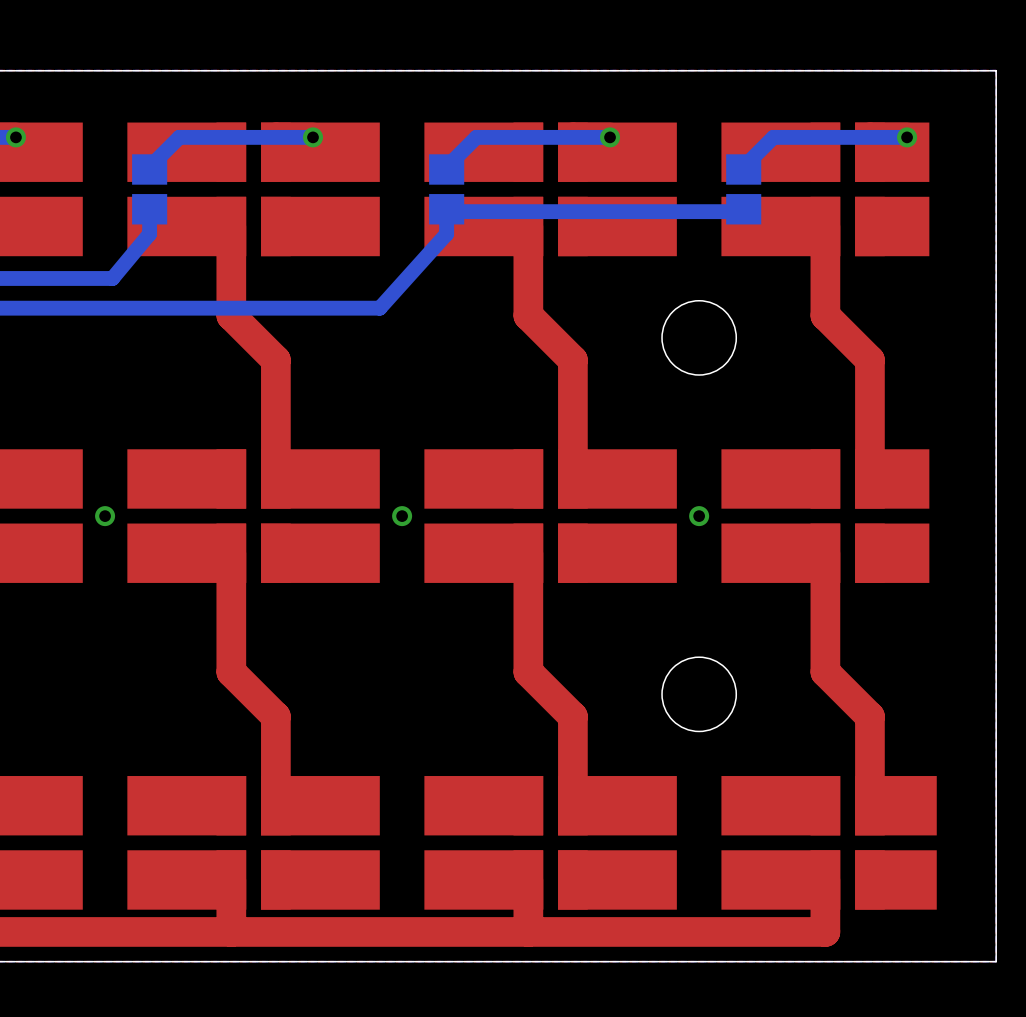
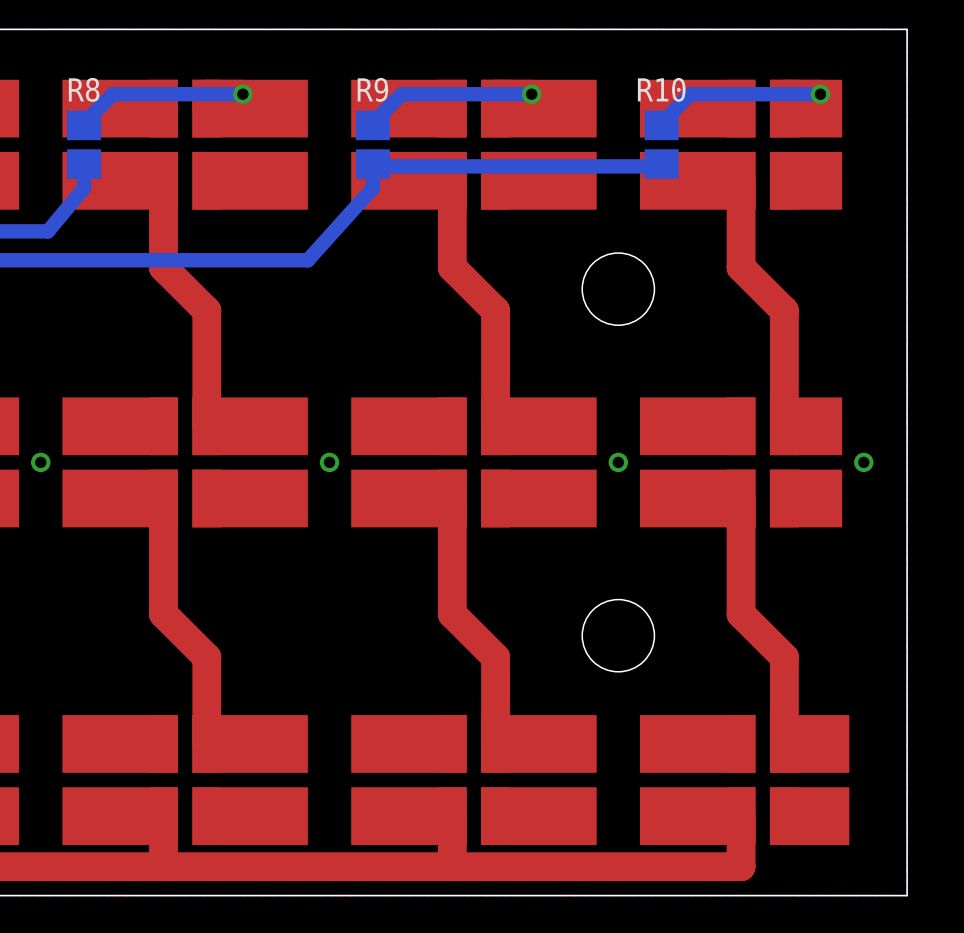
text: none -> R8 (84, 89)
text: none -> R9 (372, 89)
text: none -> R10 (661, 89)
via: none -> (863, 462)

